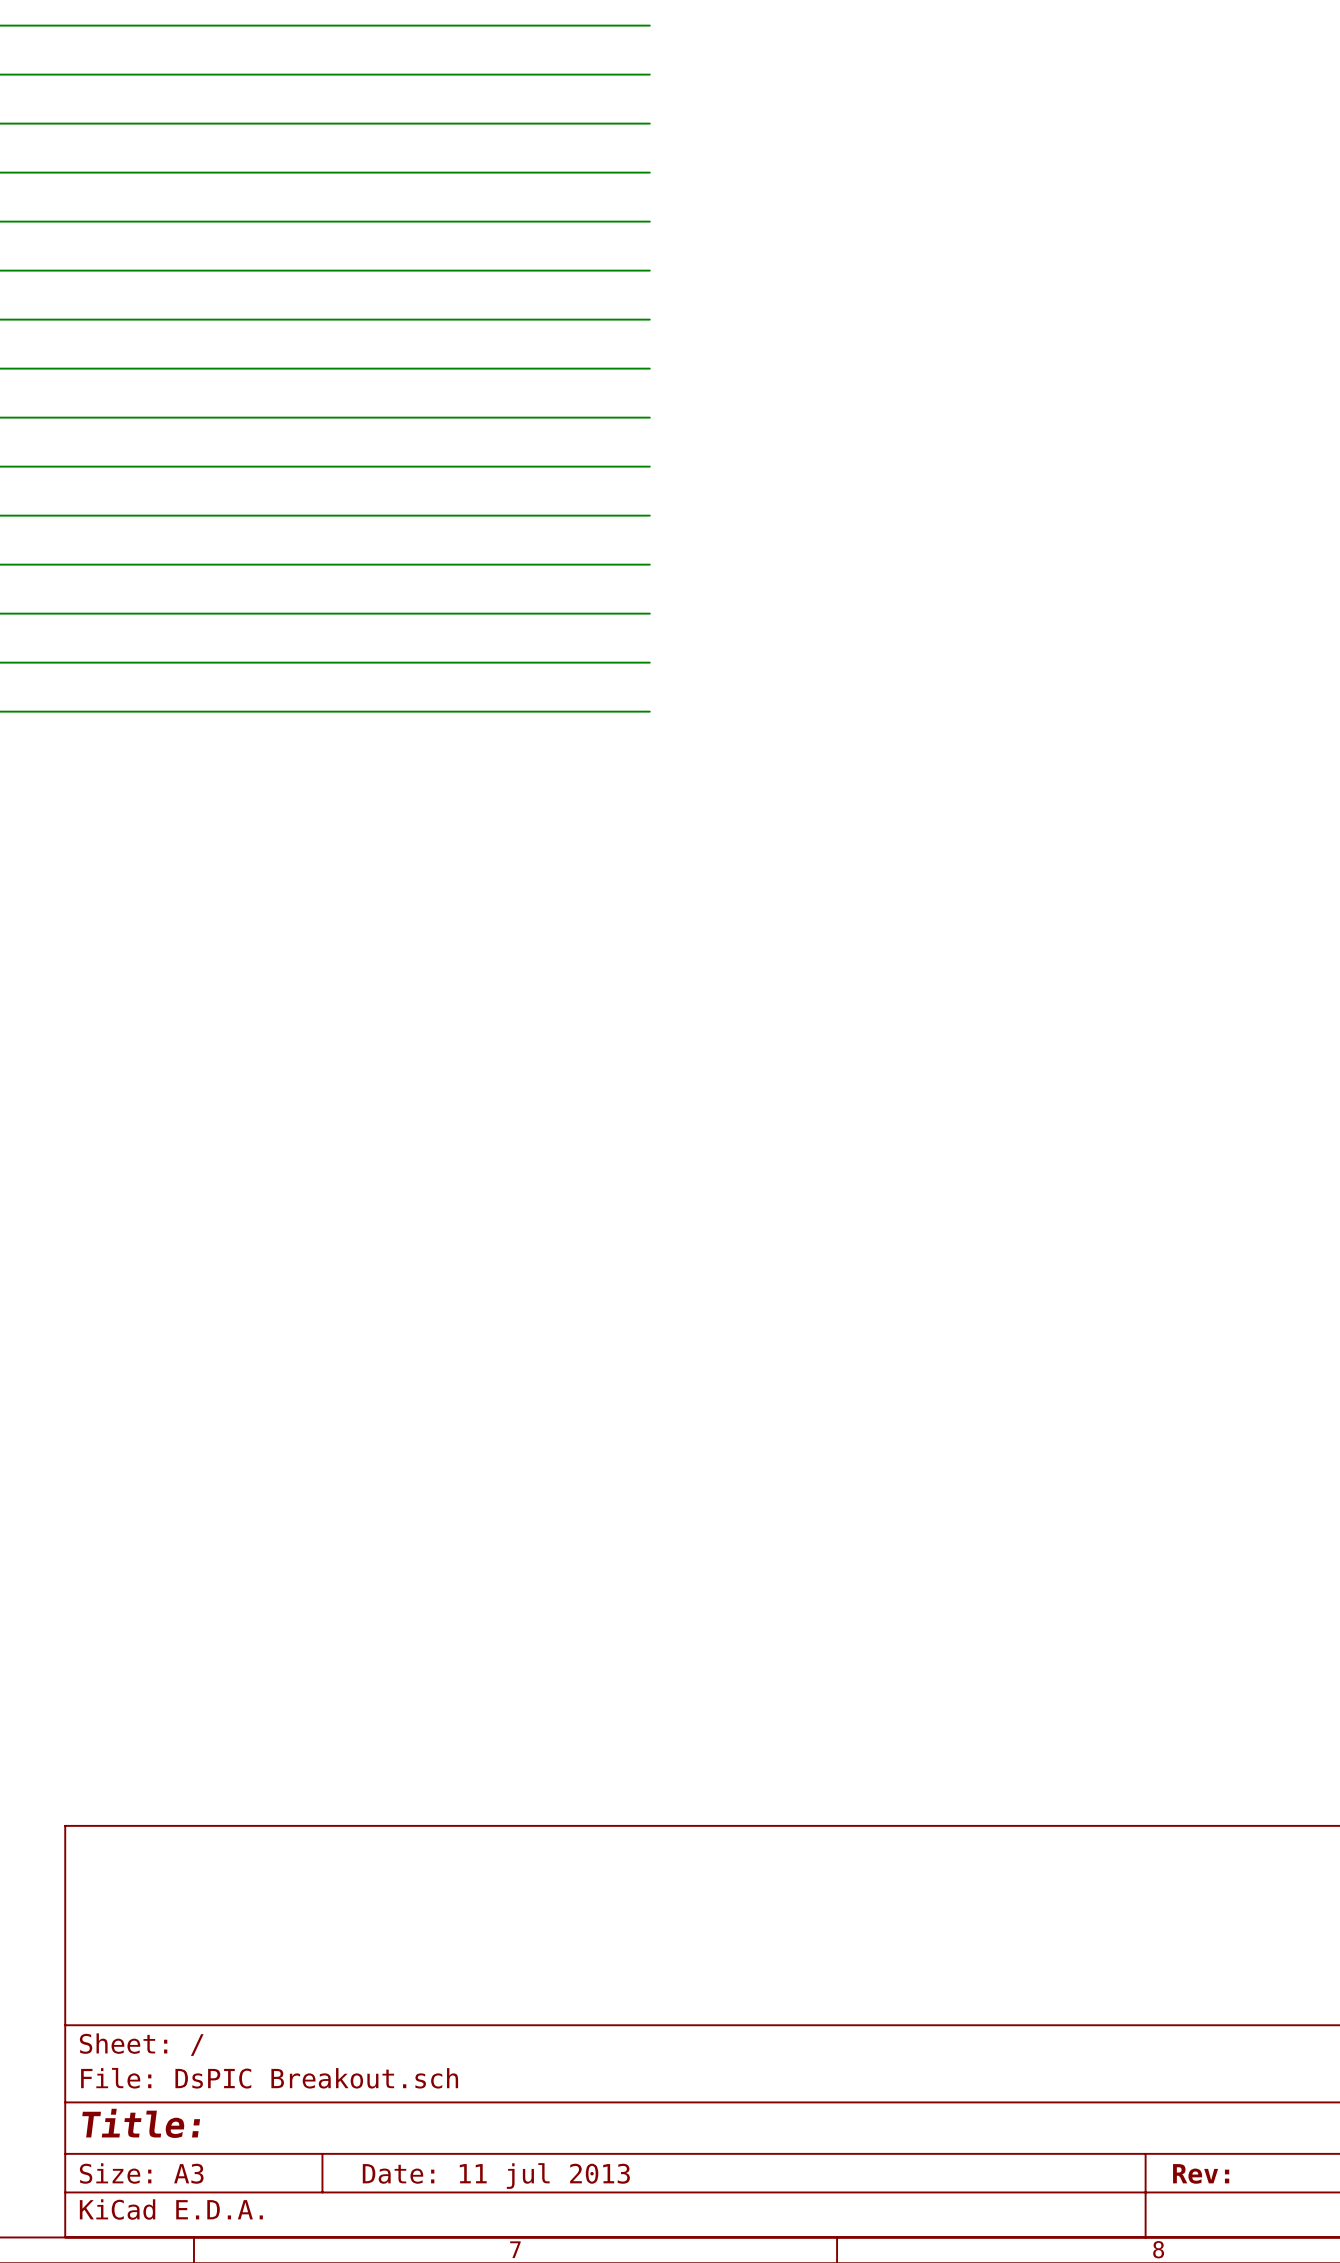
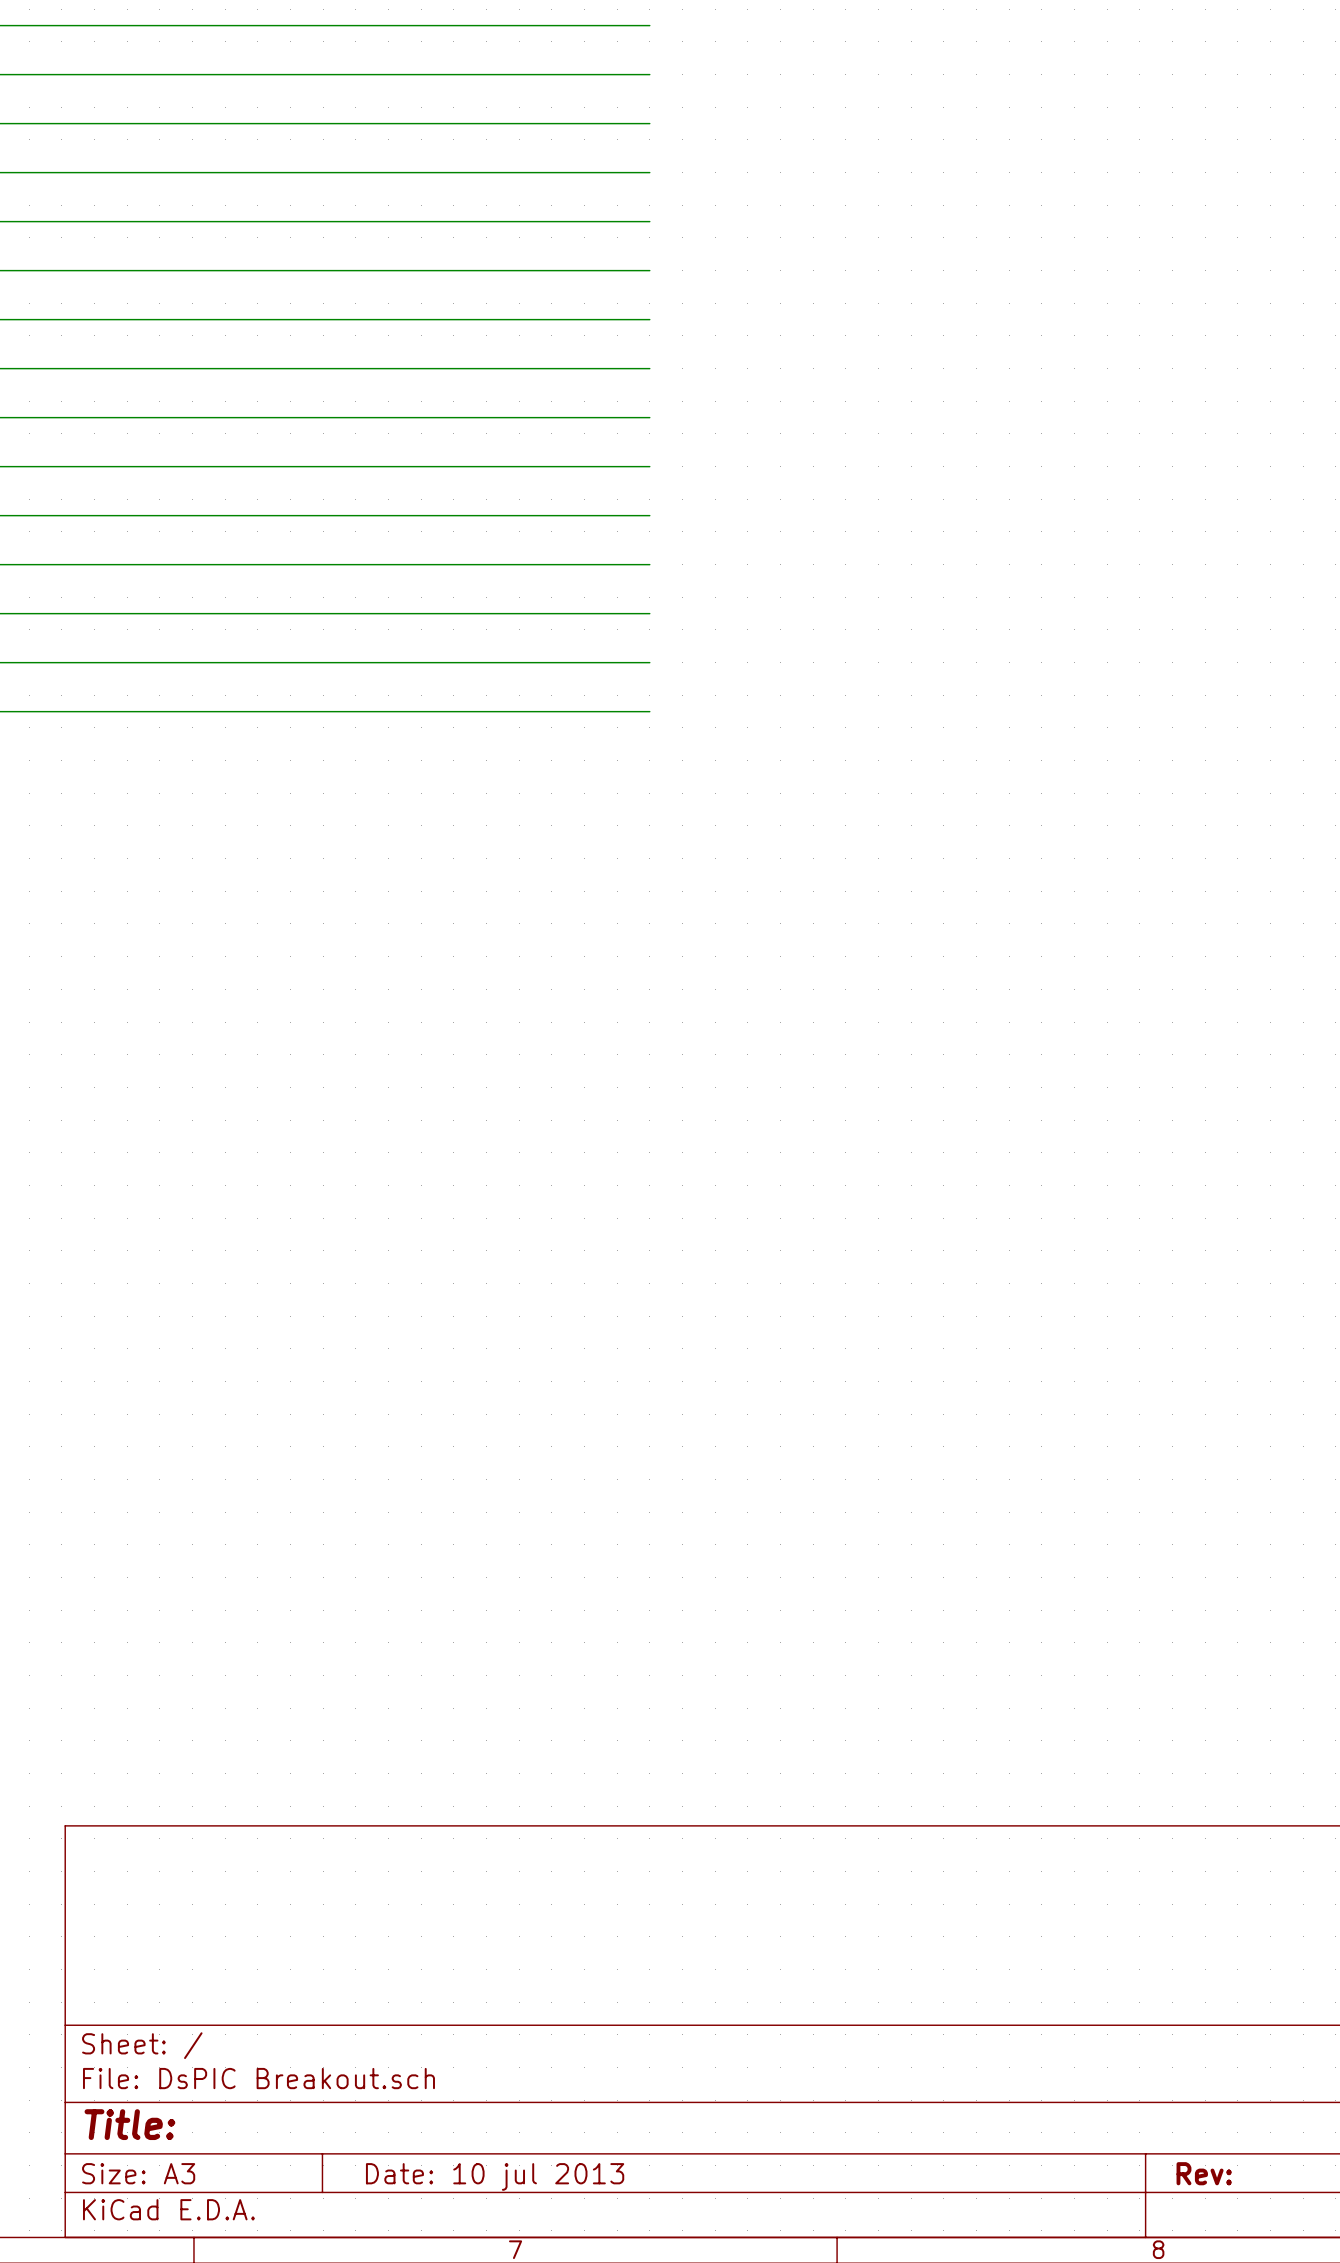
title block: Date: 11 jul 2013 (496, 2175) -> Date: 10 jul 2013 (495, 2176)

